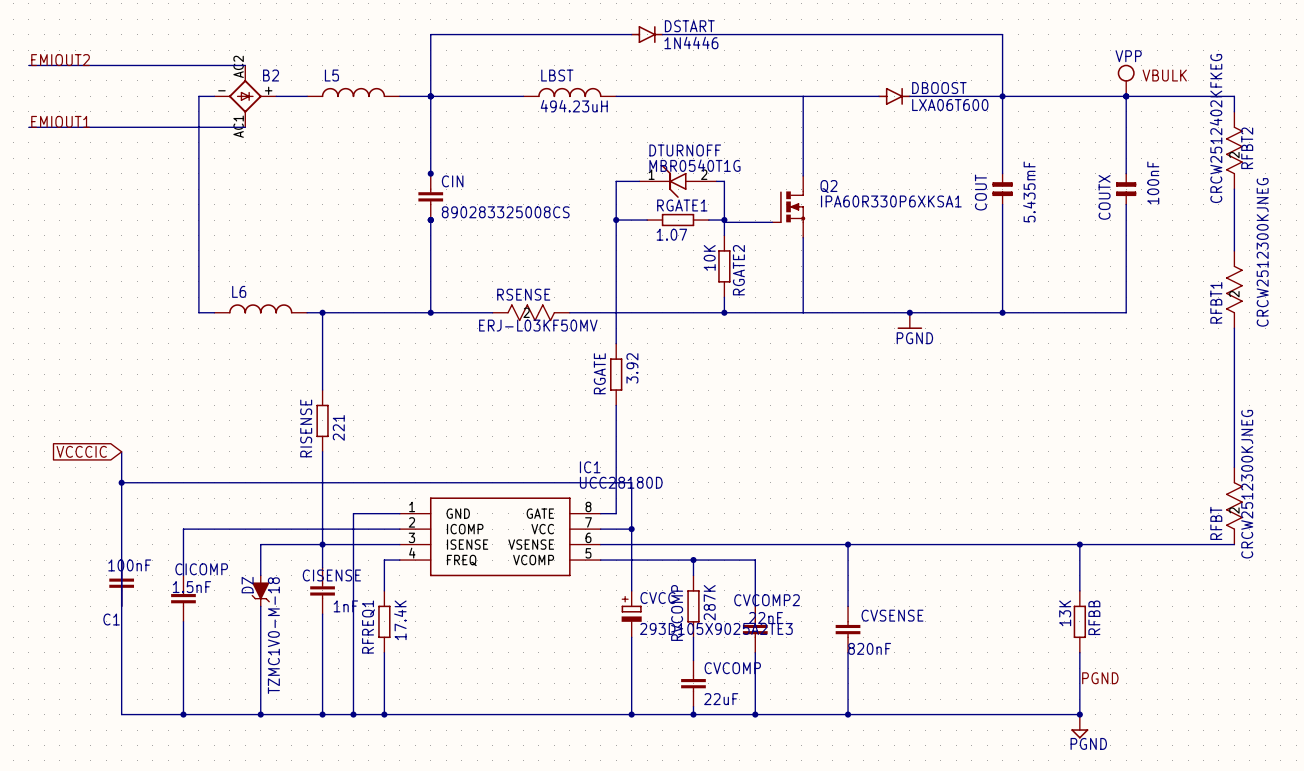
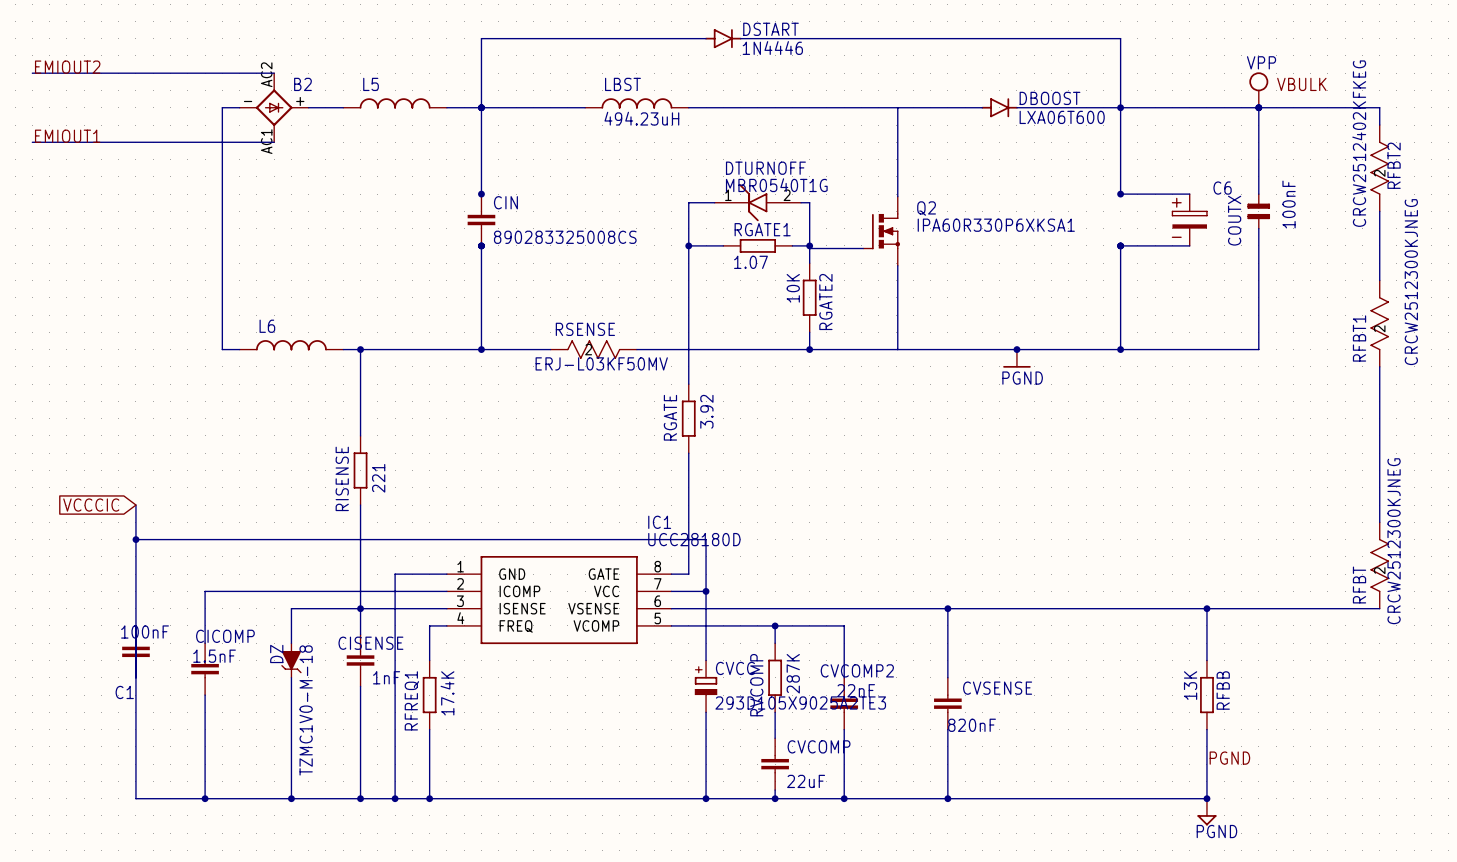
wire: none -> (1120, 194) (1189, 194)
junction: none -> (1120, 194)
COUT: 5.435mF (1002, 189) -> none
C6: none -> (1189, 220)
wire: (1002, 204) (1002, 220) -> (1189, 245) (1120, 245)
junction: none -> (1120, 245)

